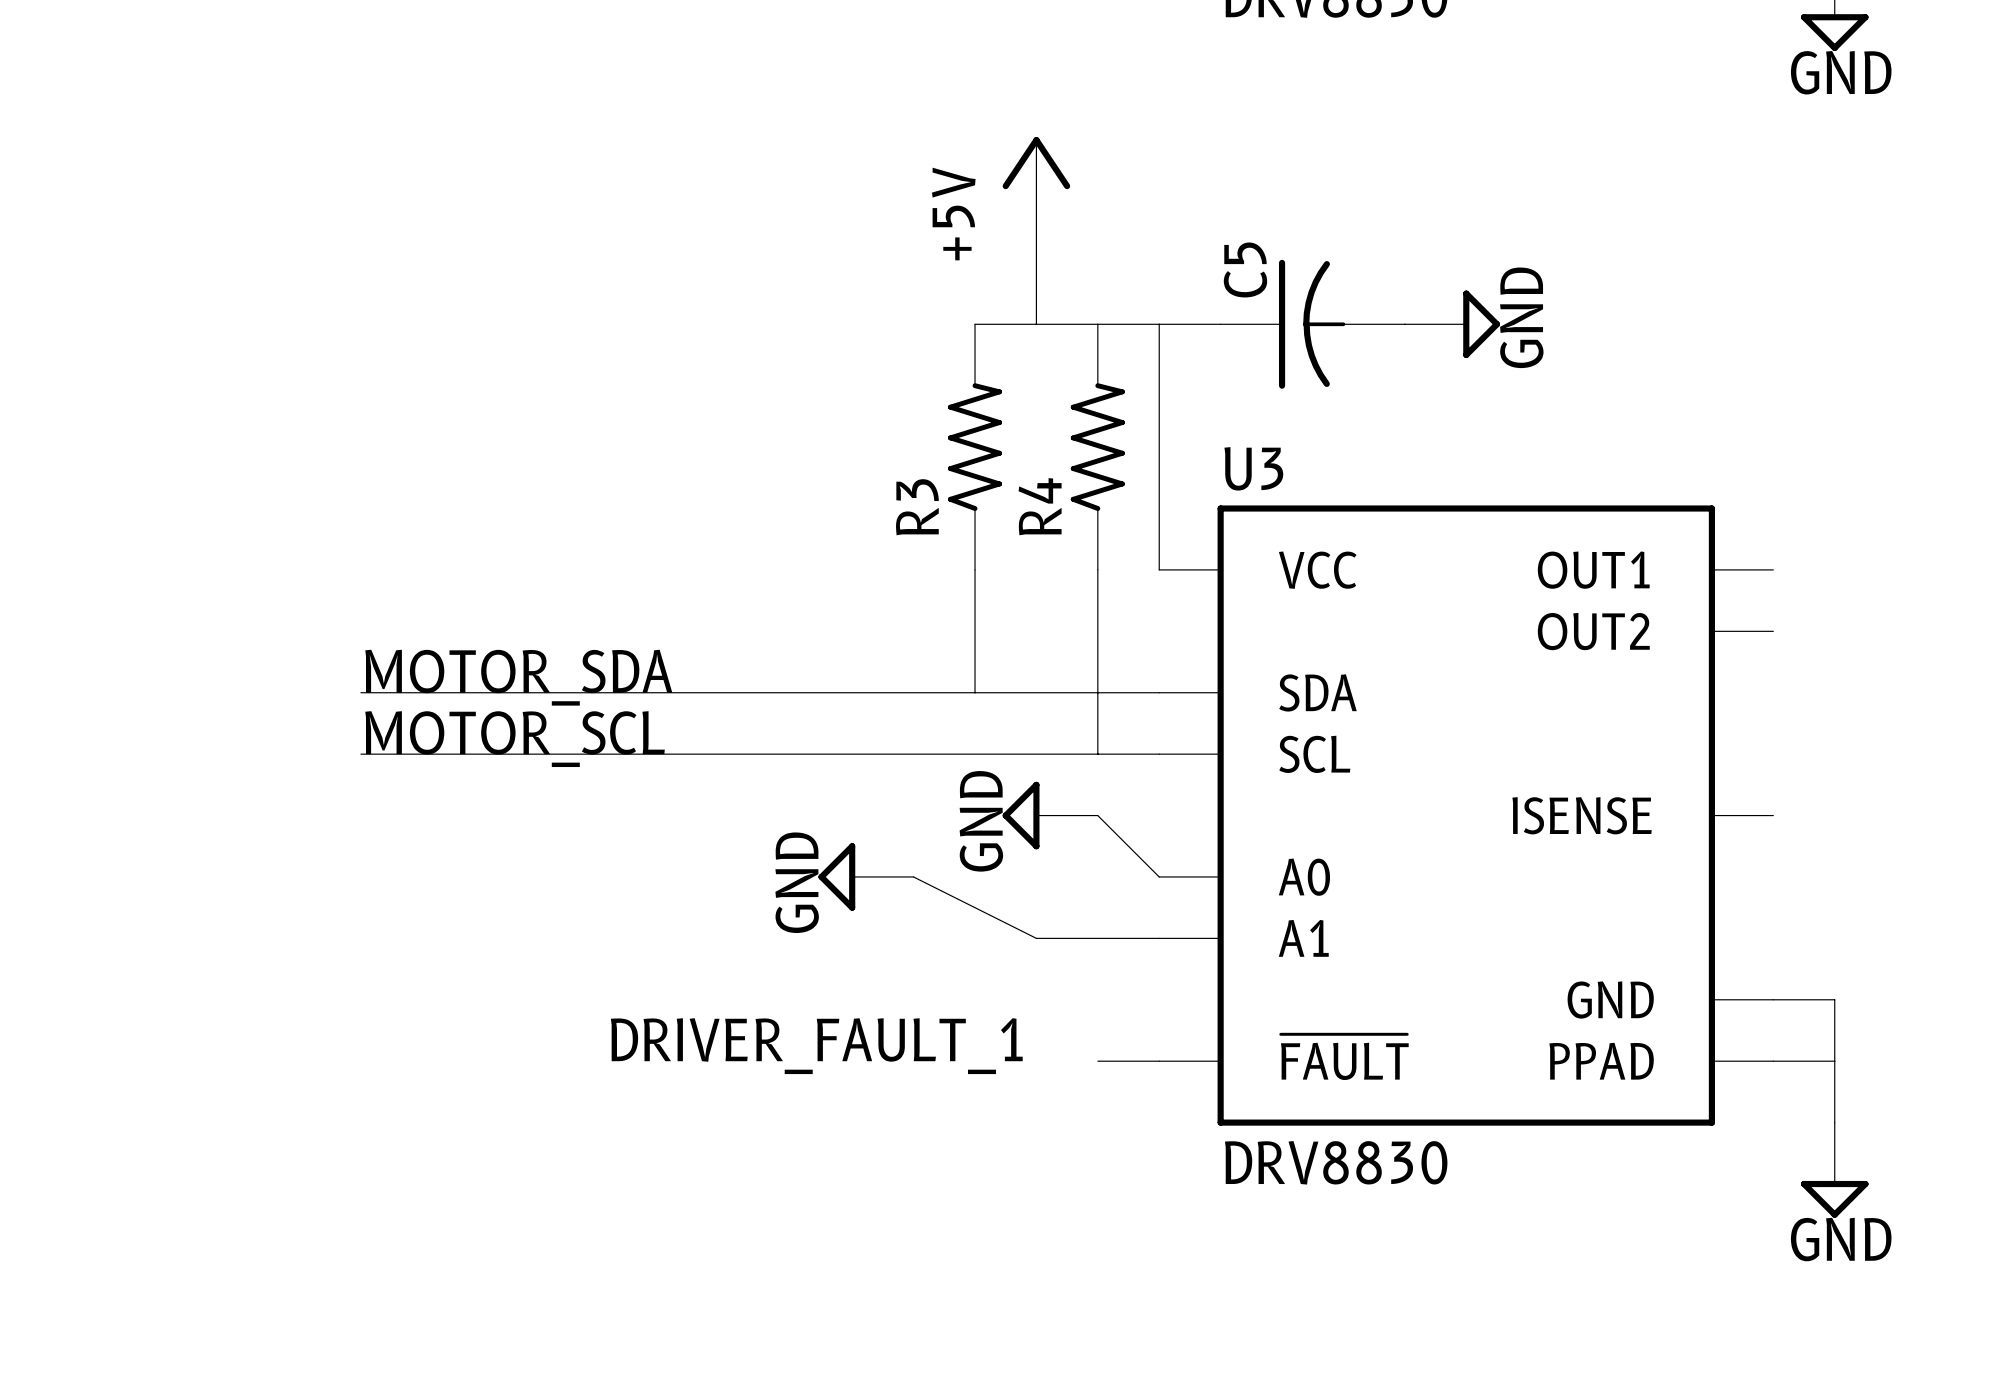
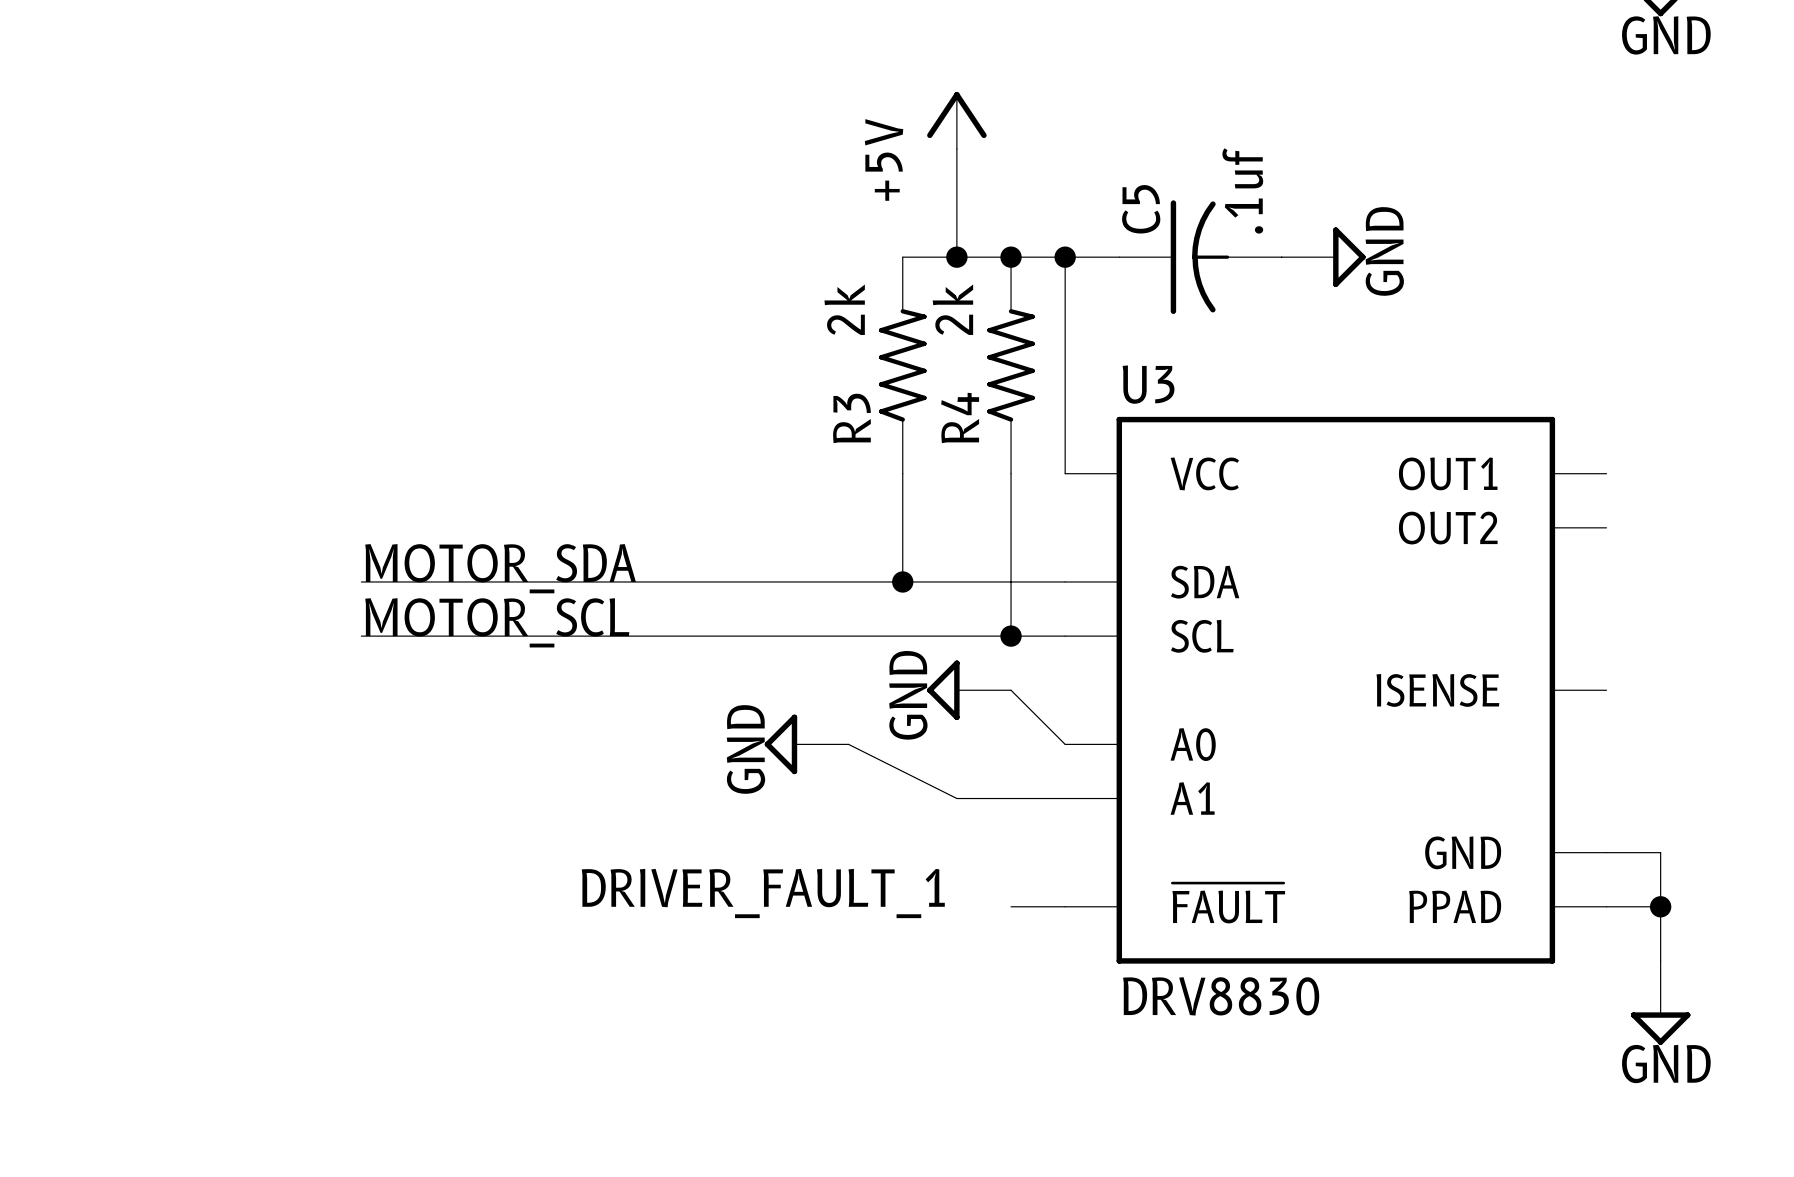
C5 value: none -> .1uf (1242, 190)
junction: none -> (956, 257)
junction: none -> (1011, 257)
junction: none -> (1065, 257)
R3 value: none -> 2k (844, 309)
R4 value: none -> 2k (952, 309)
junction: none -> (902, 581)
junction: none -> (1011, 636)
junction: none -> (1660, 906)

